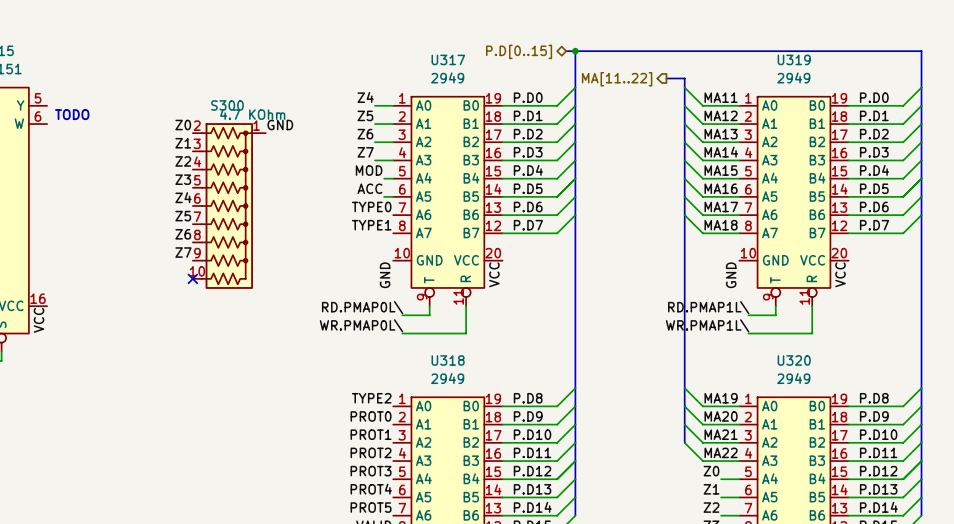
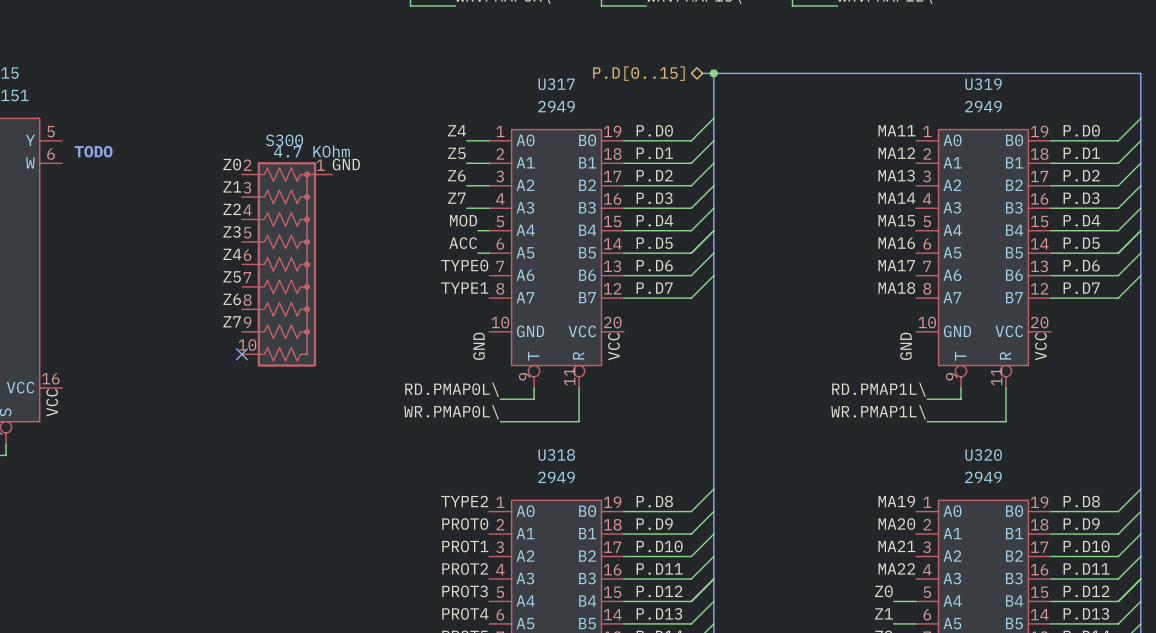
bus: (666, 78) (684, 78) (684, 442) -> none
hierarchical label: MA[11..22] (617, 79) -> none
wire: (684, 87) (702, 105) (739, 105) -> none
wire: (684, 105) (702, 124) (739, 124) -> none
wire: (684, 124) (702, 142) (739, 142) -> none
wire: (684, 142) (702, 160) (739, 160) -> none
wire: (684, 160) (702, 178) (739, 178) -> none
wire: (684, 178) (702, 196) (739, 196) -> none
wire: (684, 196) (702, 215) (739, 215) -> none
wire: (684, 215) (702, 233) (739, 233) -> none
wire: (684, 388) (702, 406) (739, 406) -> none
wire: (684, 406) (702, 424) (739, 424) -> none
wire: (684, 424) (702, 442) (739, 442) -> none
wire: (684, 442) (702, 461) (739, 461) -> none

